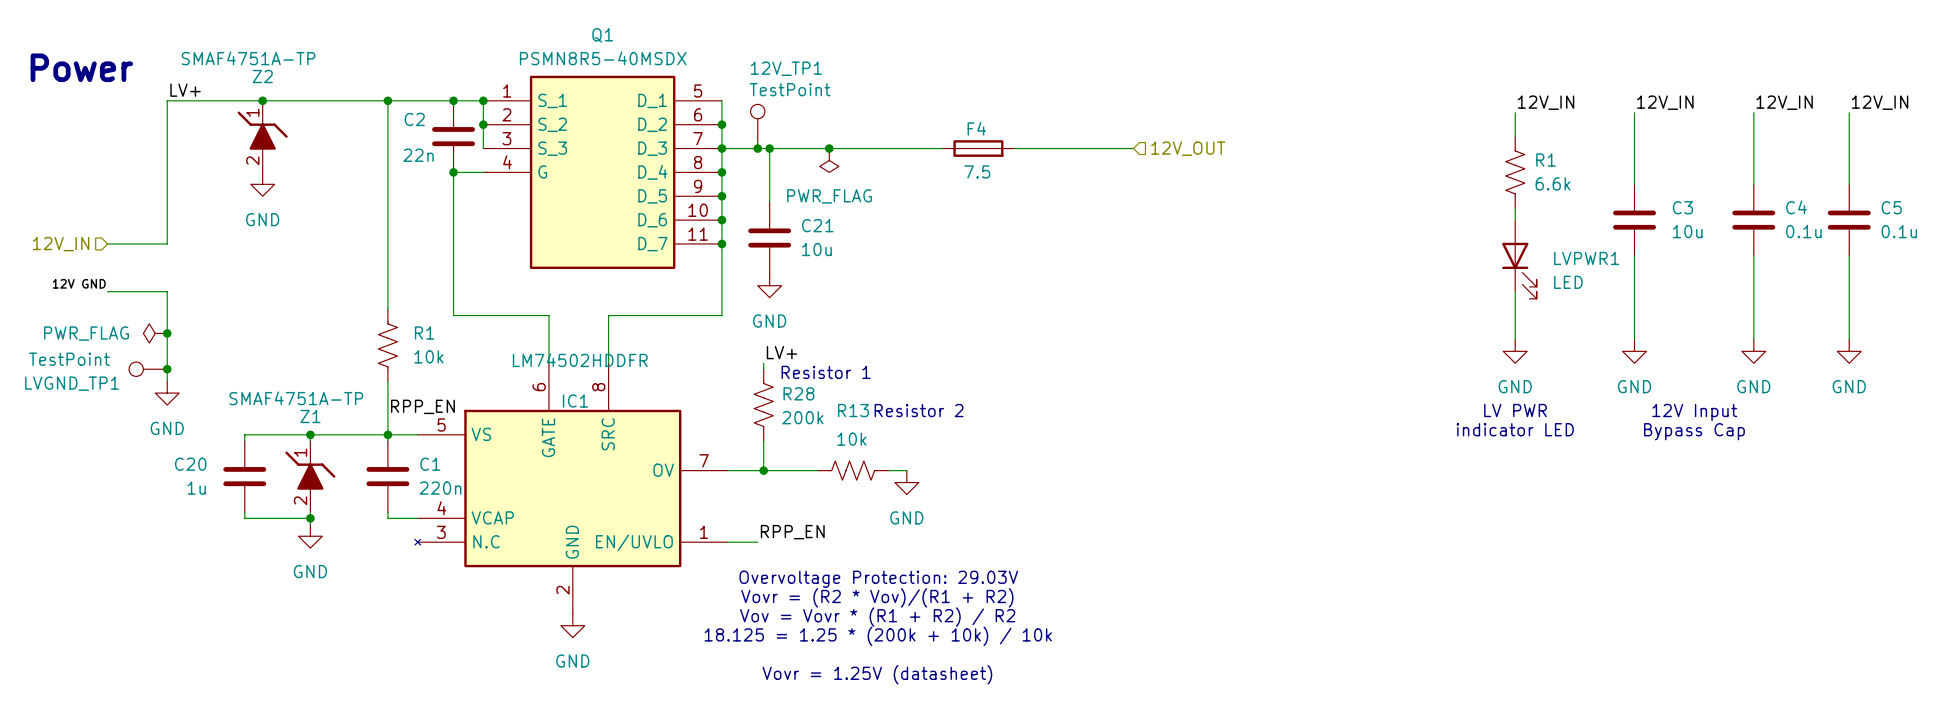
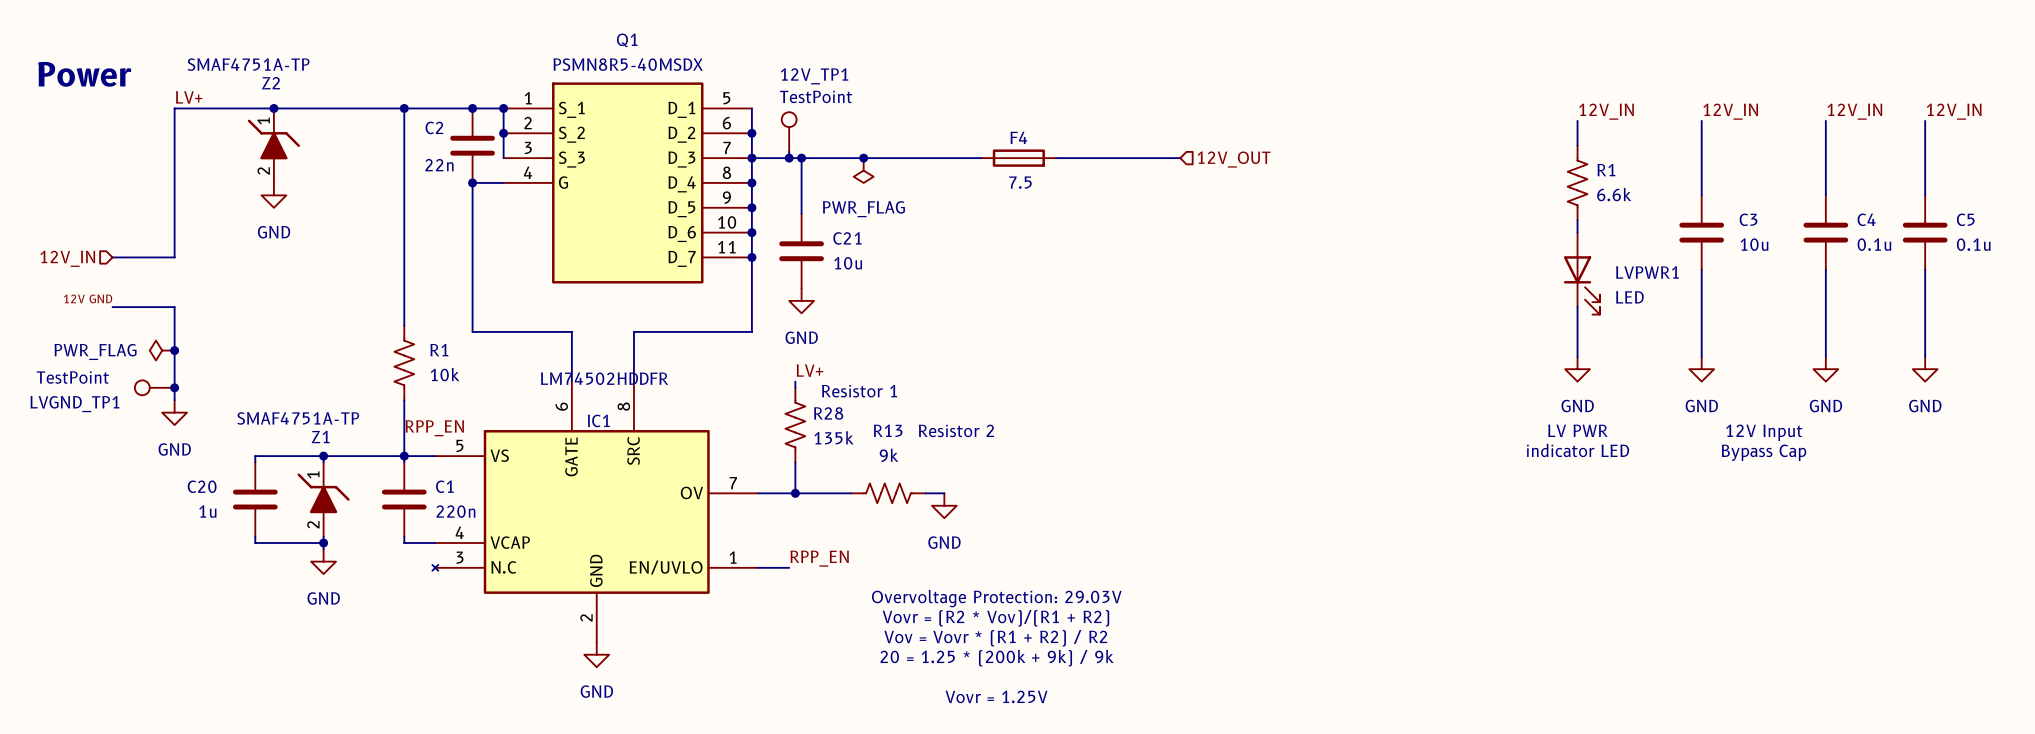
R28 value: 200k (802, 417) -> 135k (833, 437)
R13 value: 10k (851, 439) -> 9k (889, 455)
text position: Overvoltage Protection: 29.03V (878, 579) -> Overvoltage Protection: 29.03V (996, 598)
text position: Vovr = (R2 * Vov)/(R1 + R2) (877, 597) -> Vovr = (R2 * Vov)/(R1 + R2) (995, 618)
text position: Vov = Vovr * (R1 + R2) / R2 (877, 617) -> Vov = Vovr * (R1 + R2) / R2 (995, 638)
text: 18.125 = 1.25 * (200k + 10k) / 10k (878, 636) -> 20 = 1.25 * (200k + 9k) / 9k (997, 658)
text: Vovr = 1.25V (datasheet) (877, 674) -> Vovr = 1.25V (996, 696)

